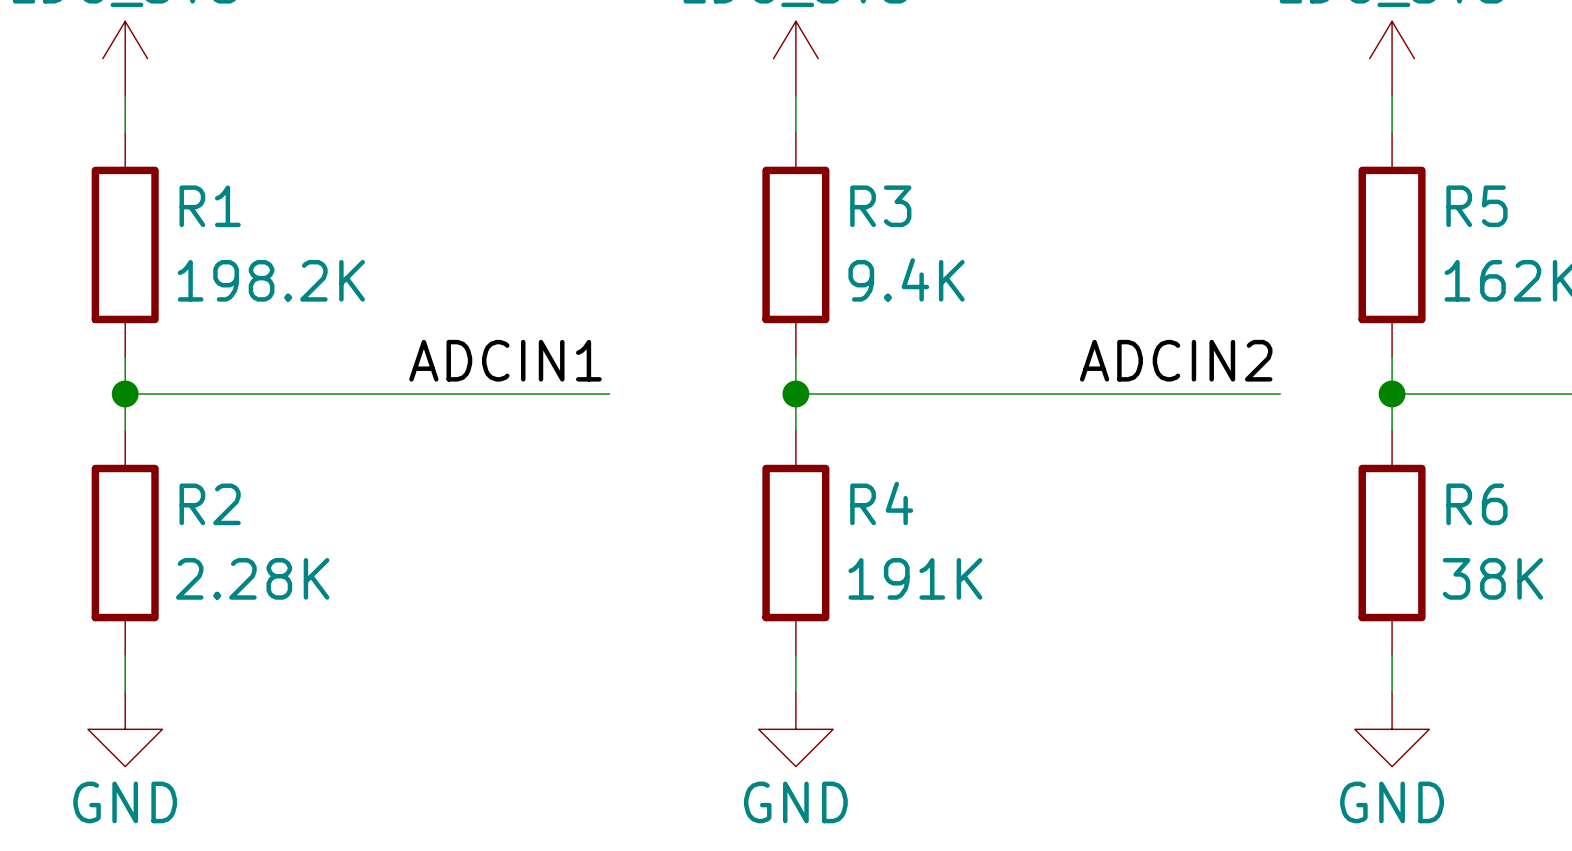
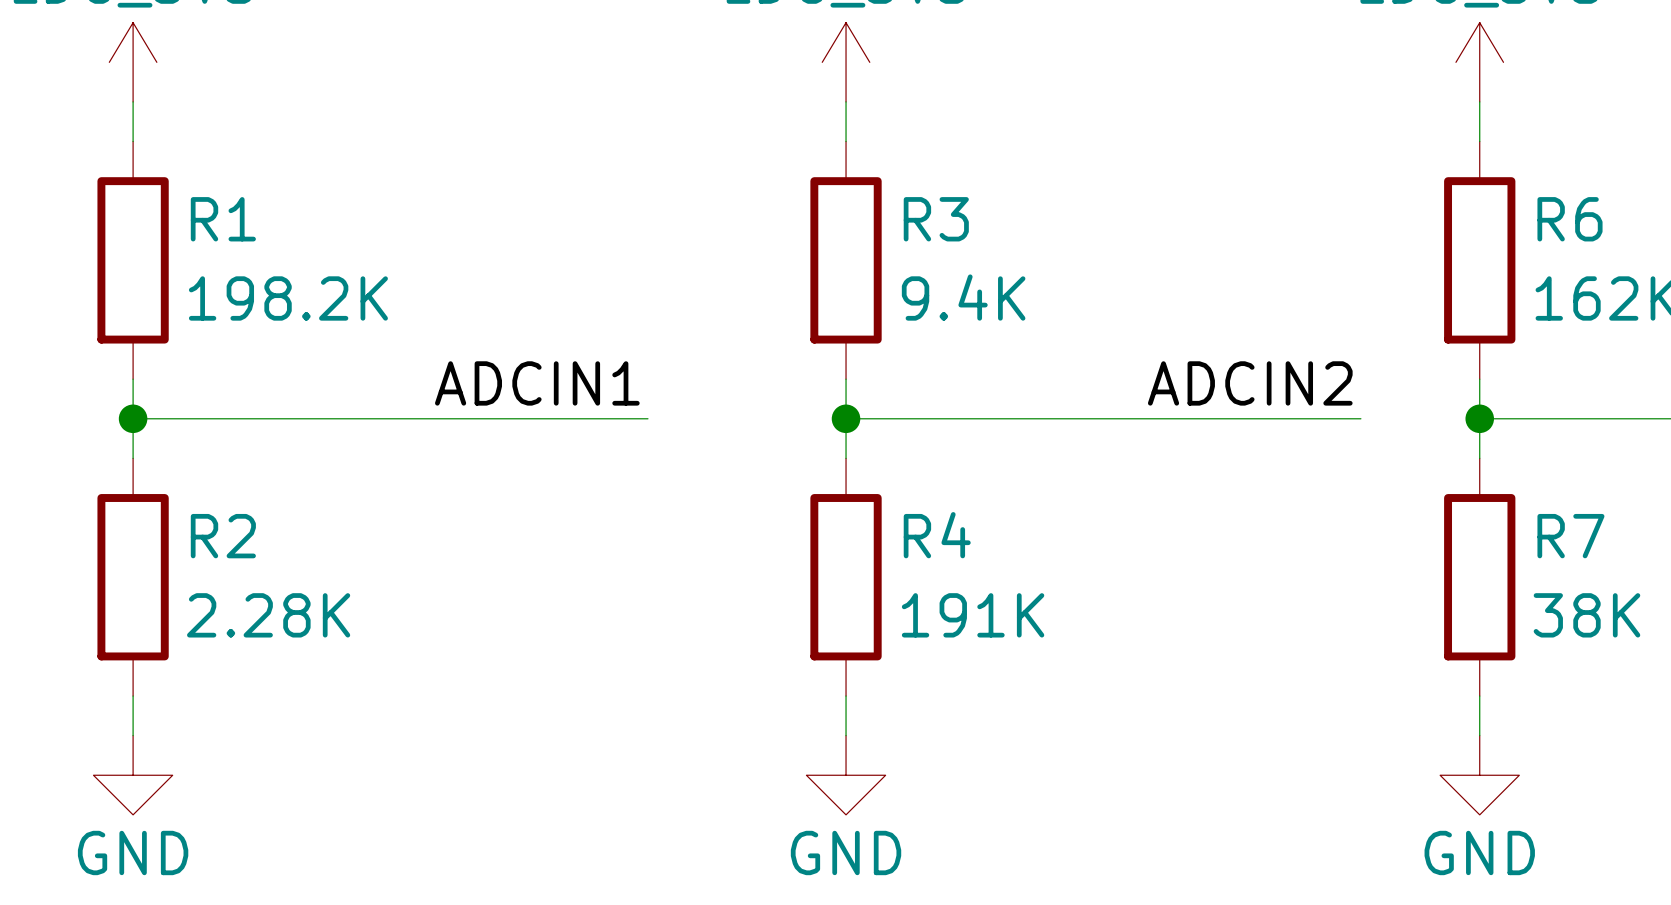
R5 name: R5 (1476, 206) -> R6 (1570, 219)
R6 name: R6 (1476, 504) -> R7 (1570, 536)

